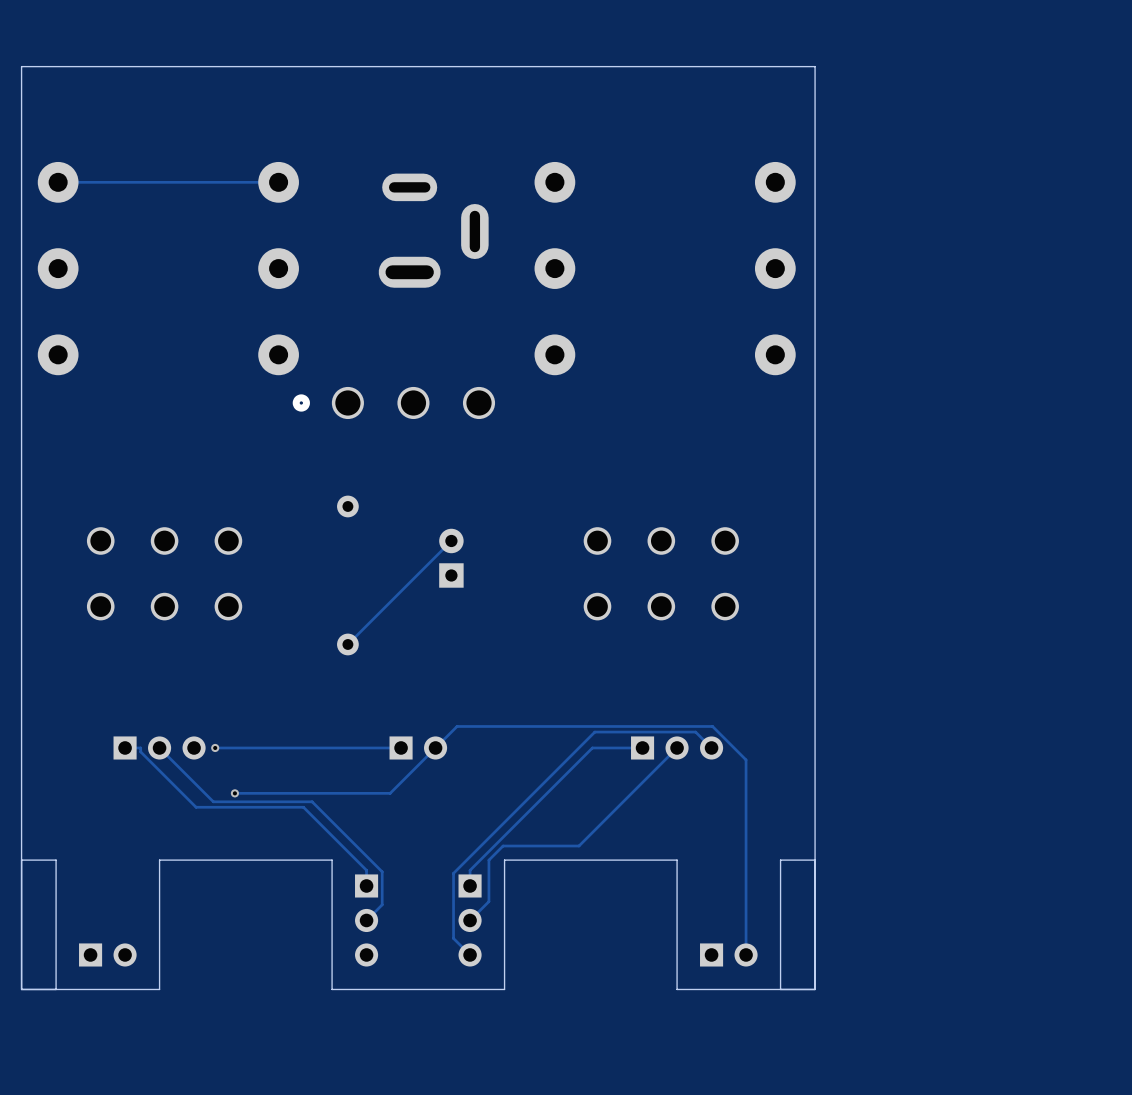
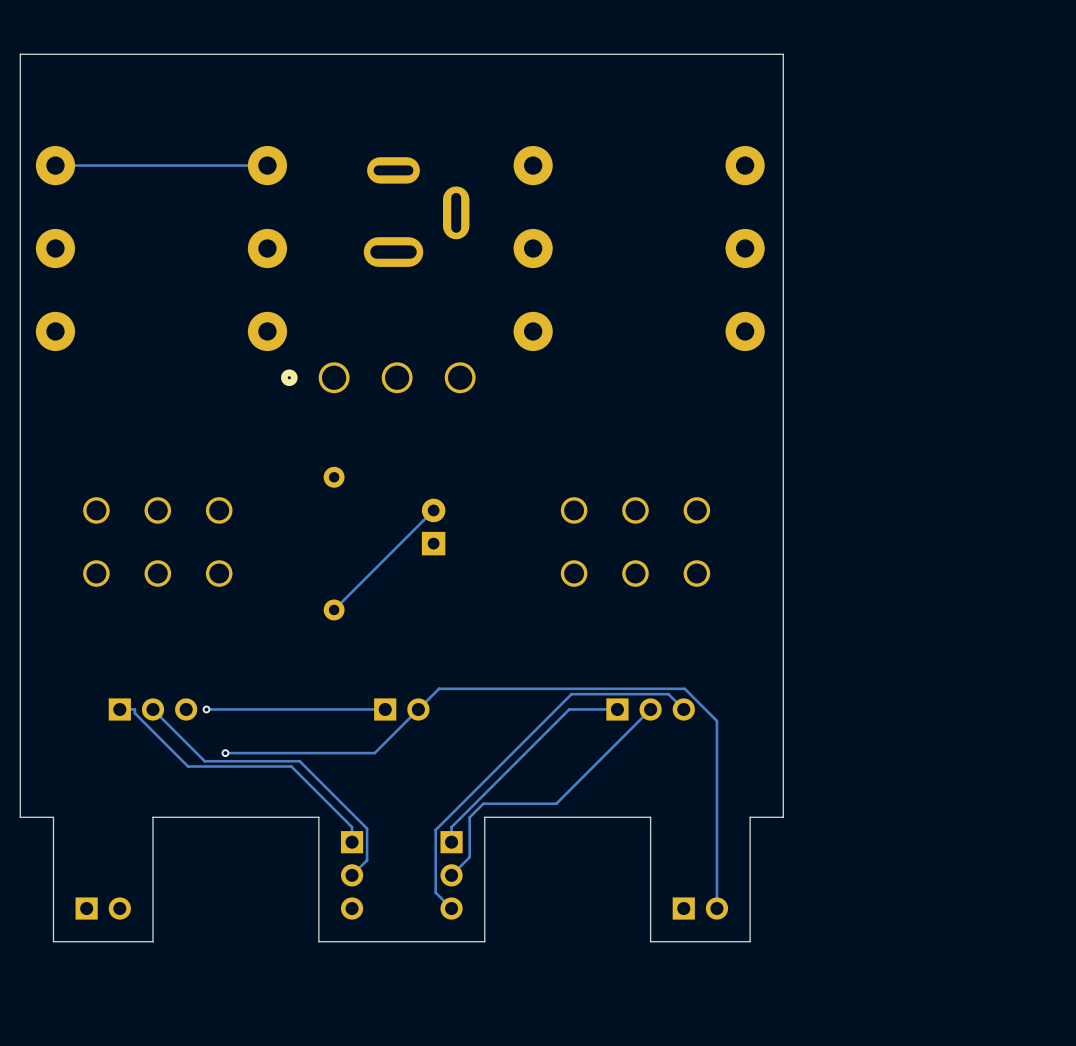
board edge: (21, 860) (21, 989) (56, 989) -> none
board edge: (815, 860) (815, 989) (780, 989) -> none

